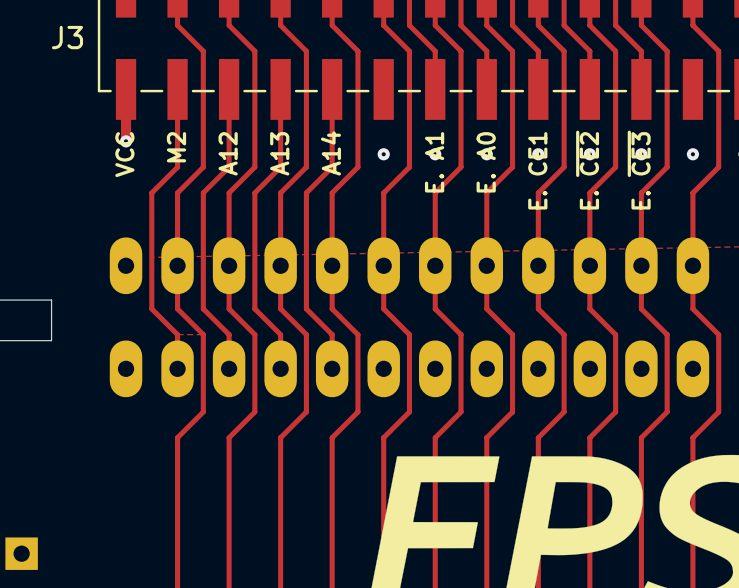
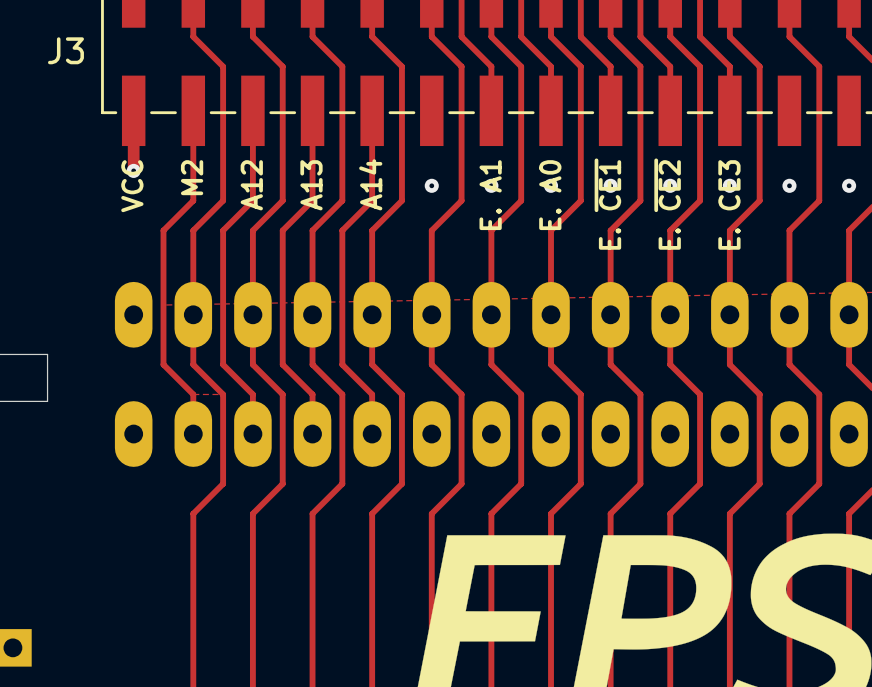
text: E. CE1 (537, 170) -> E. ~{CE1} (607, 204)
text: E. ~{CE3} (639, 170) -> E. CE3 (729, 204)

